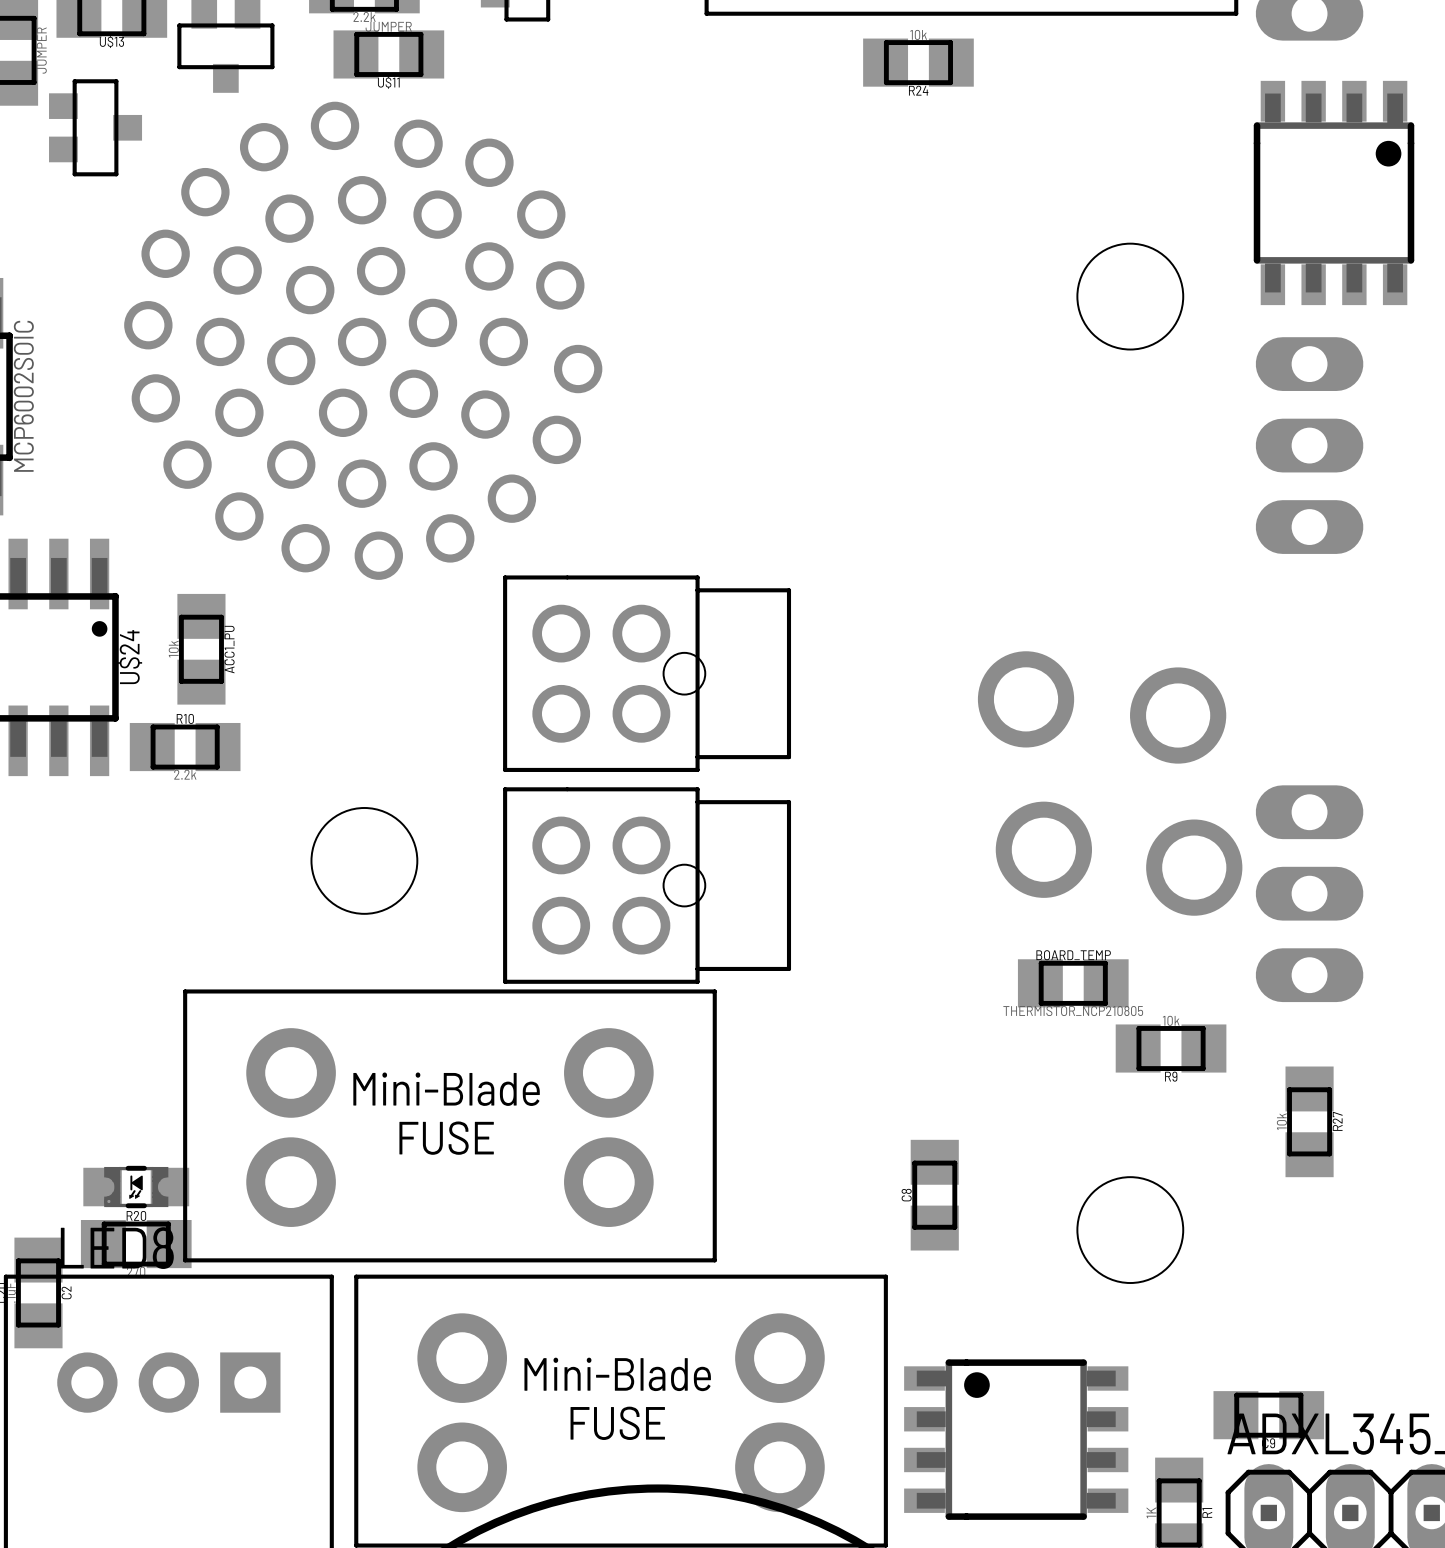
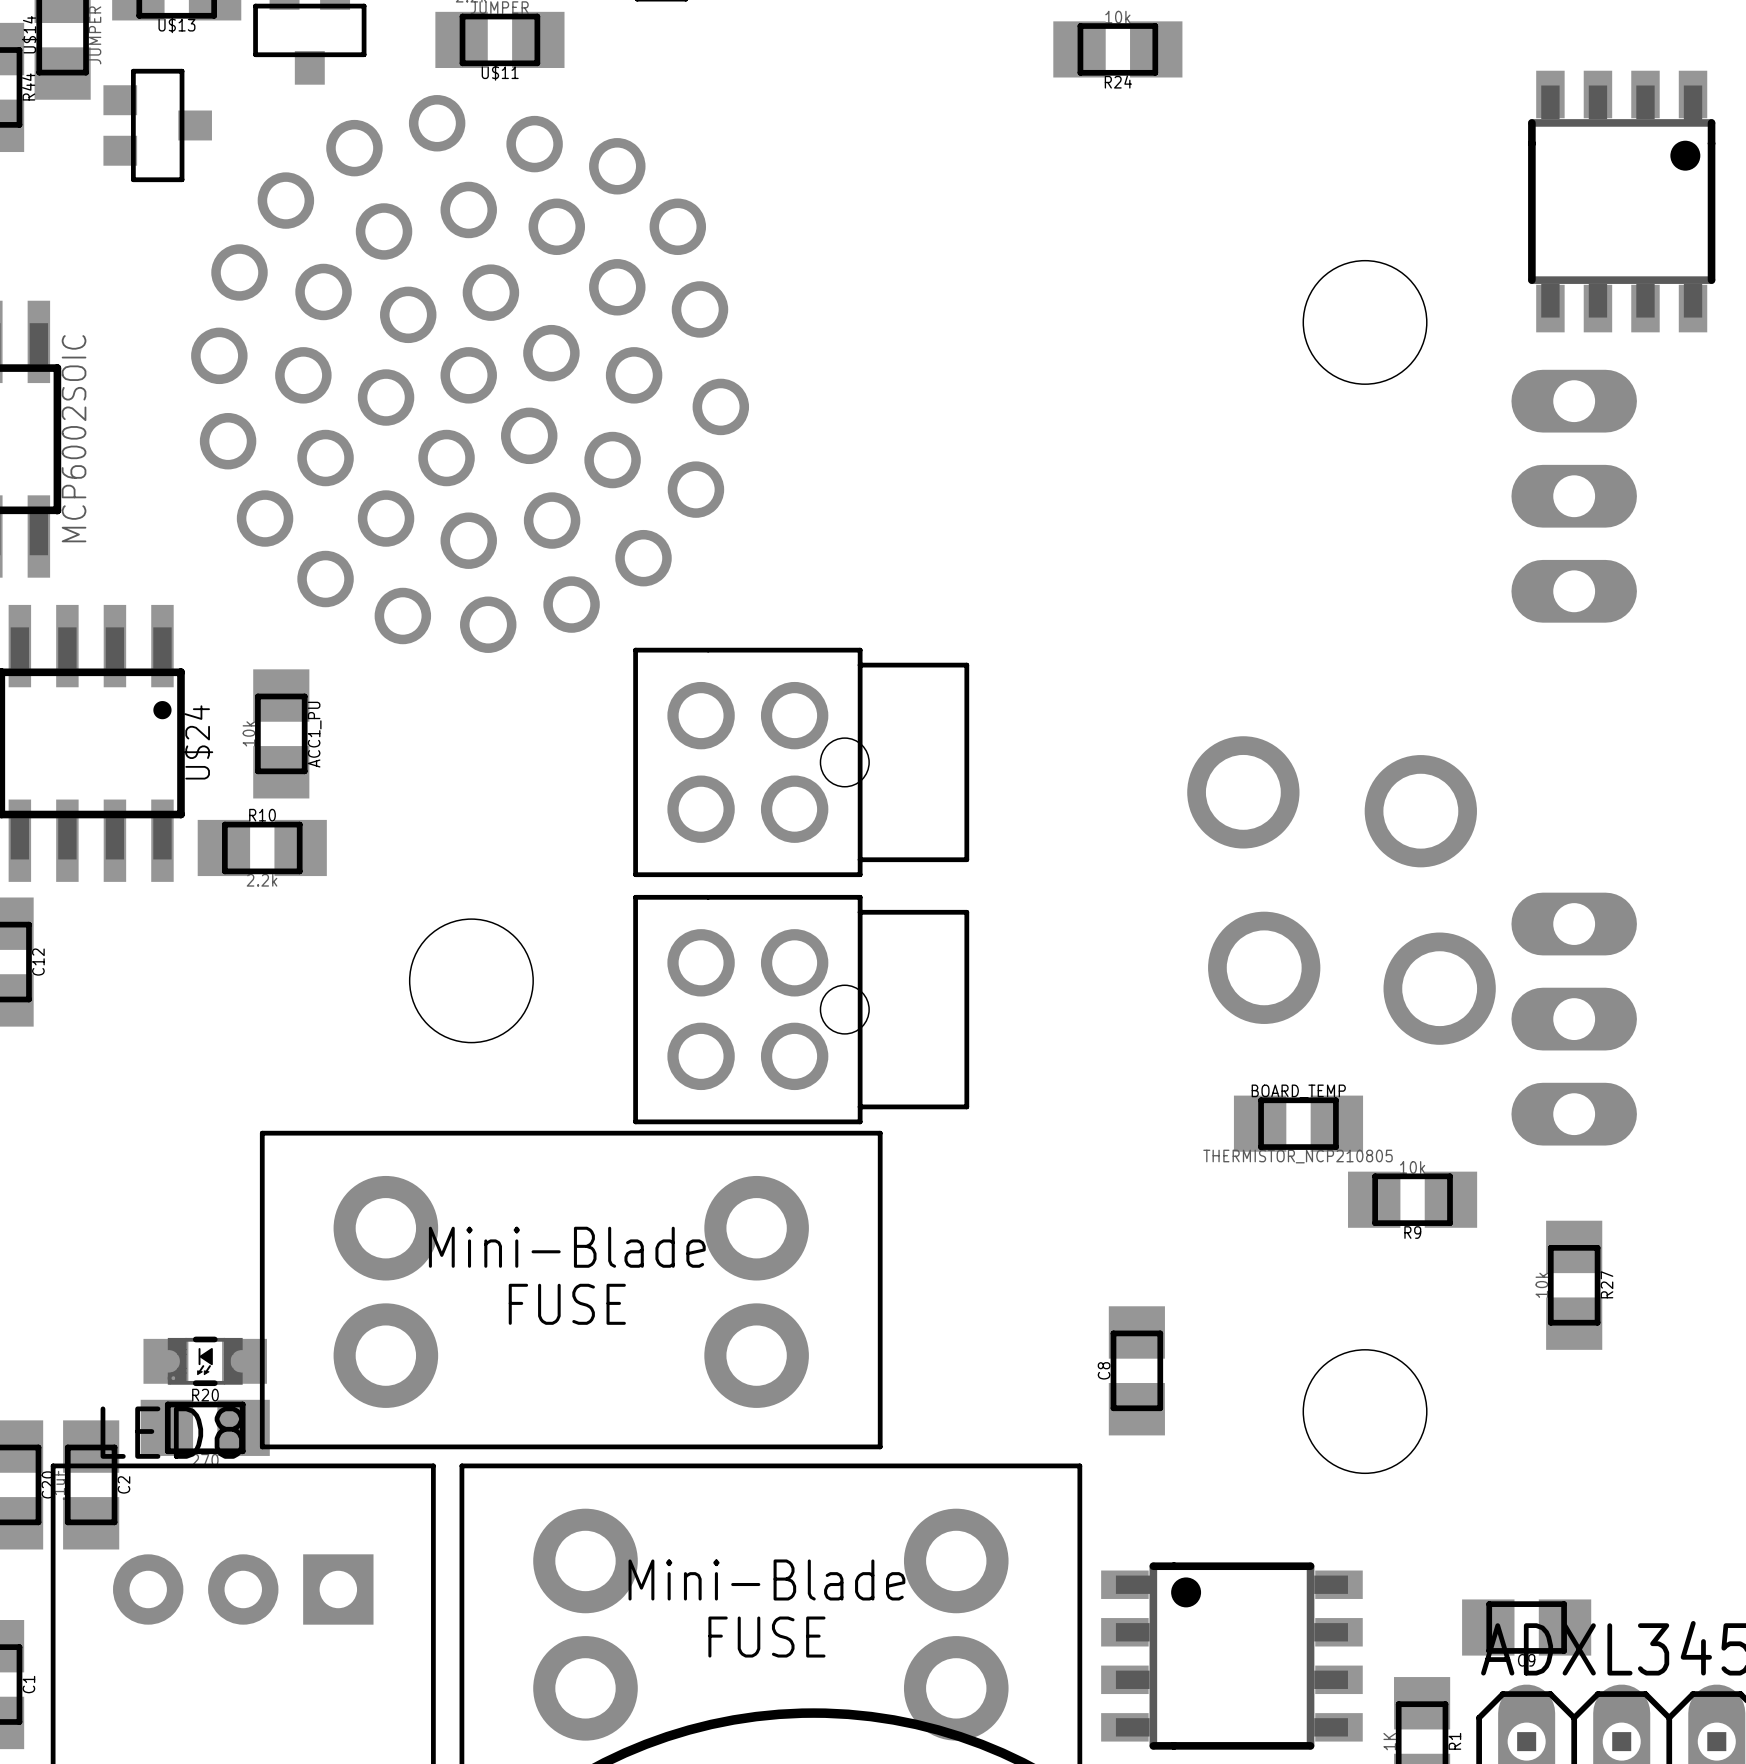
part position: (1334, 192) -> (1621, 201)

